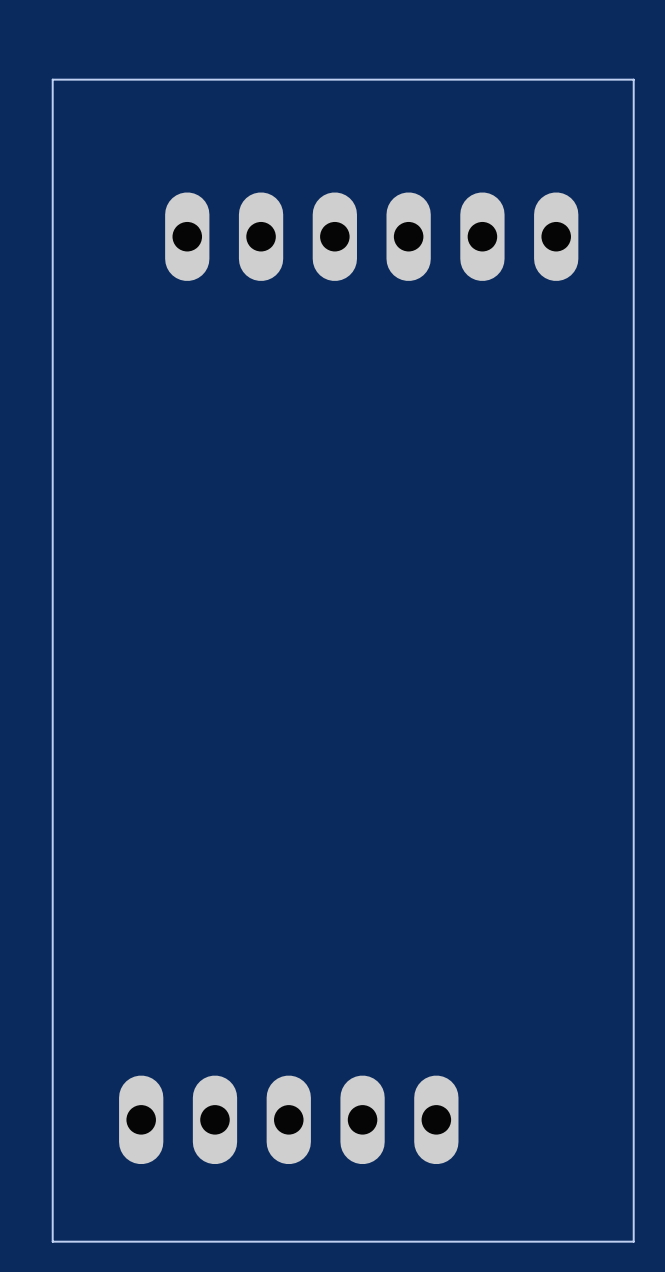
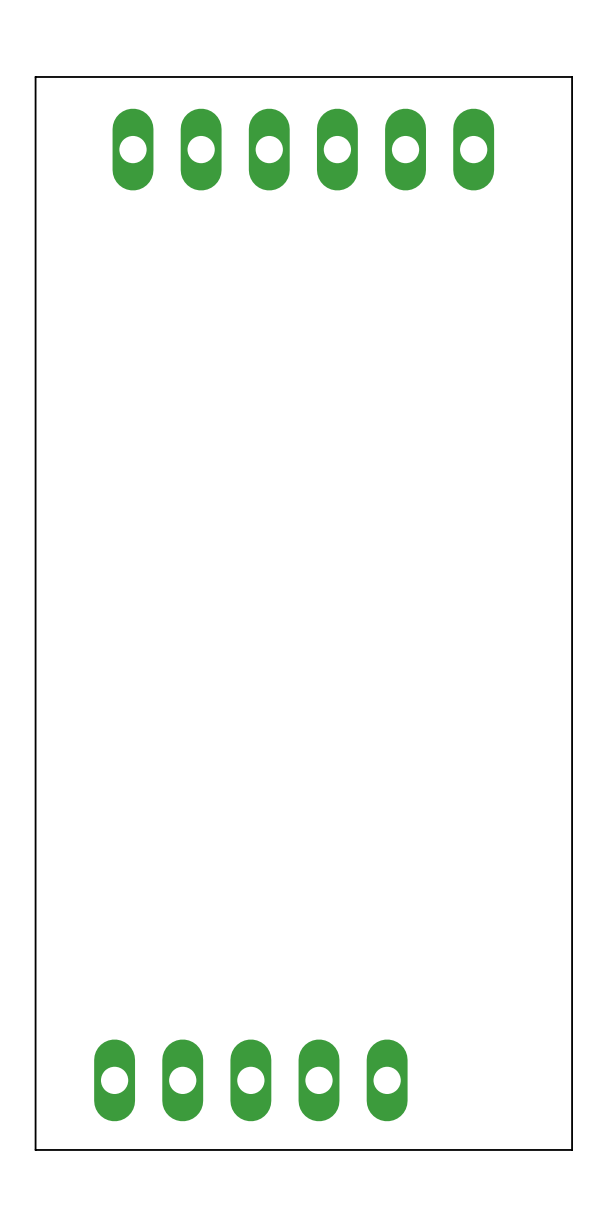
part position: (371, 236) -> (303, 149)
part position: (288, 1119) -> (250, 1080)

